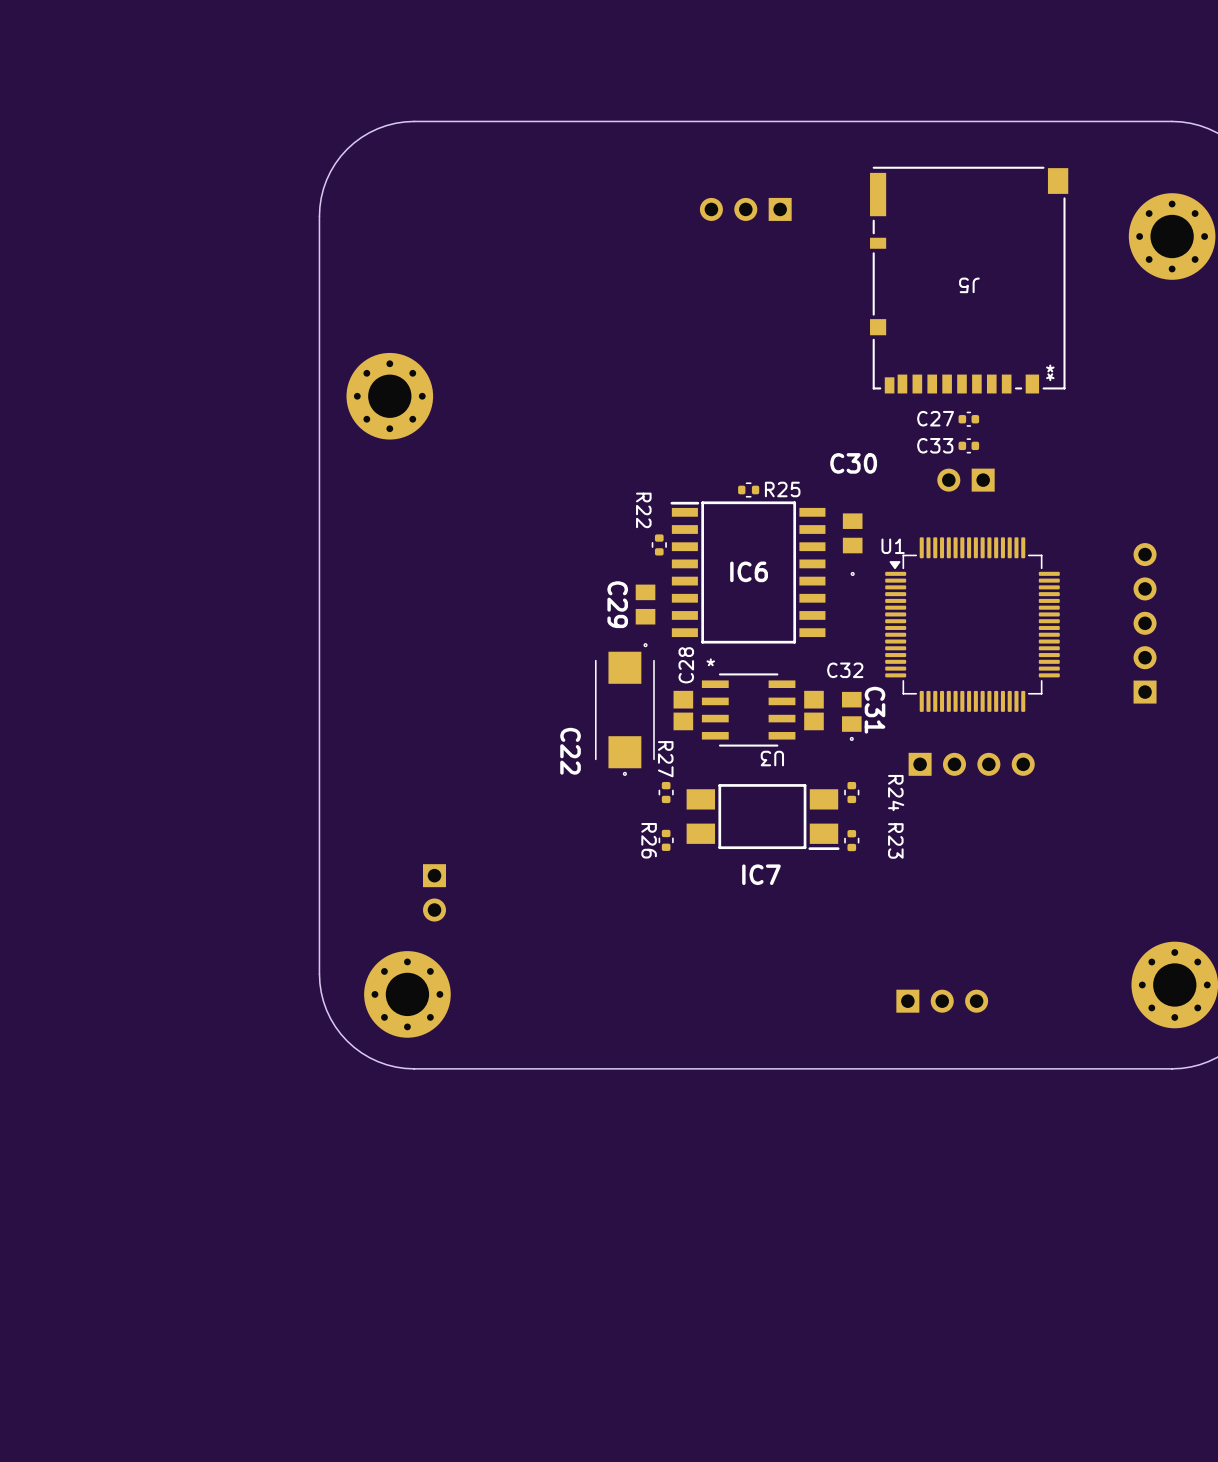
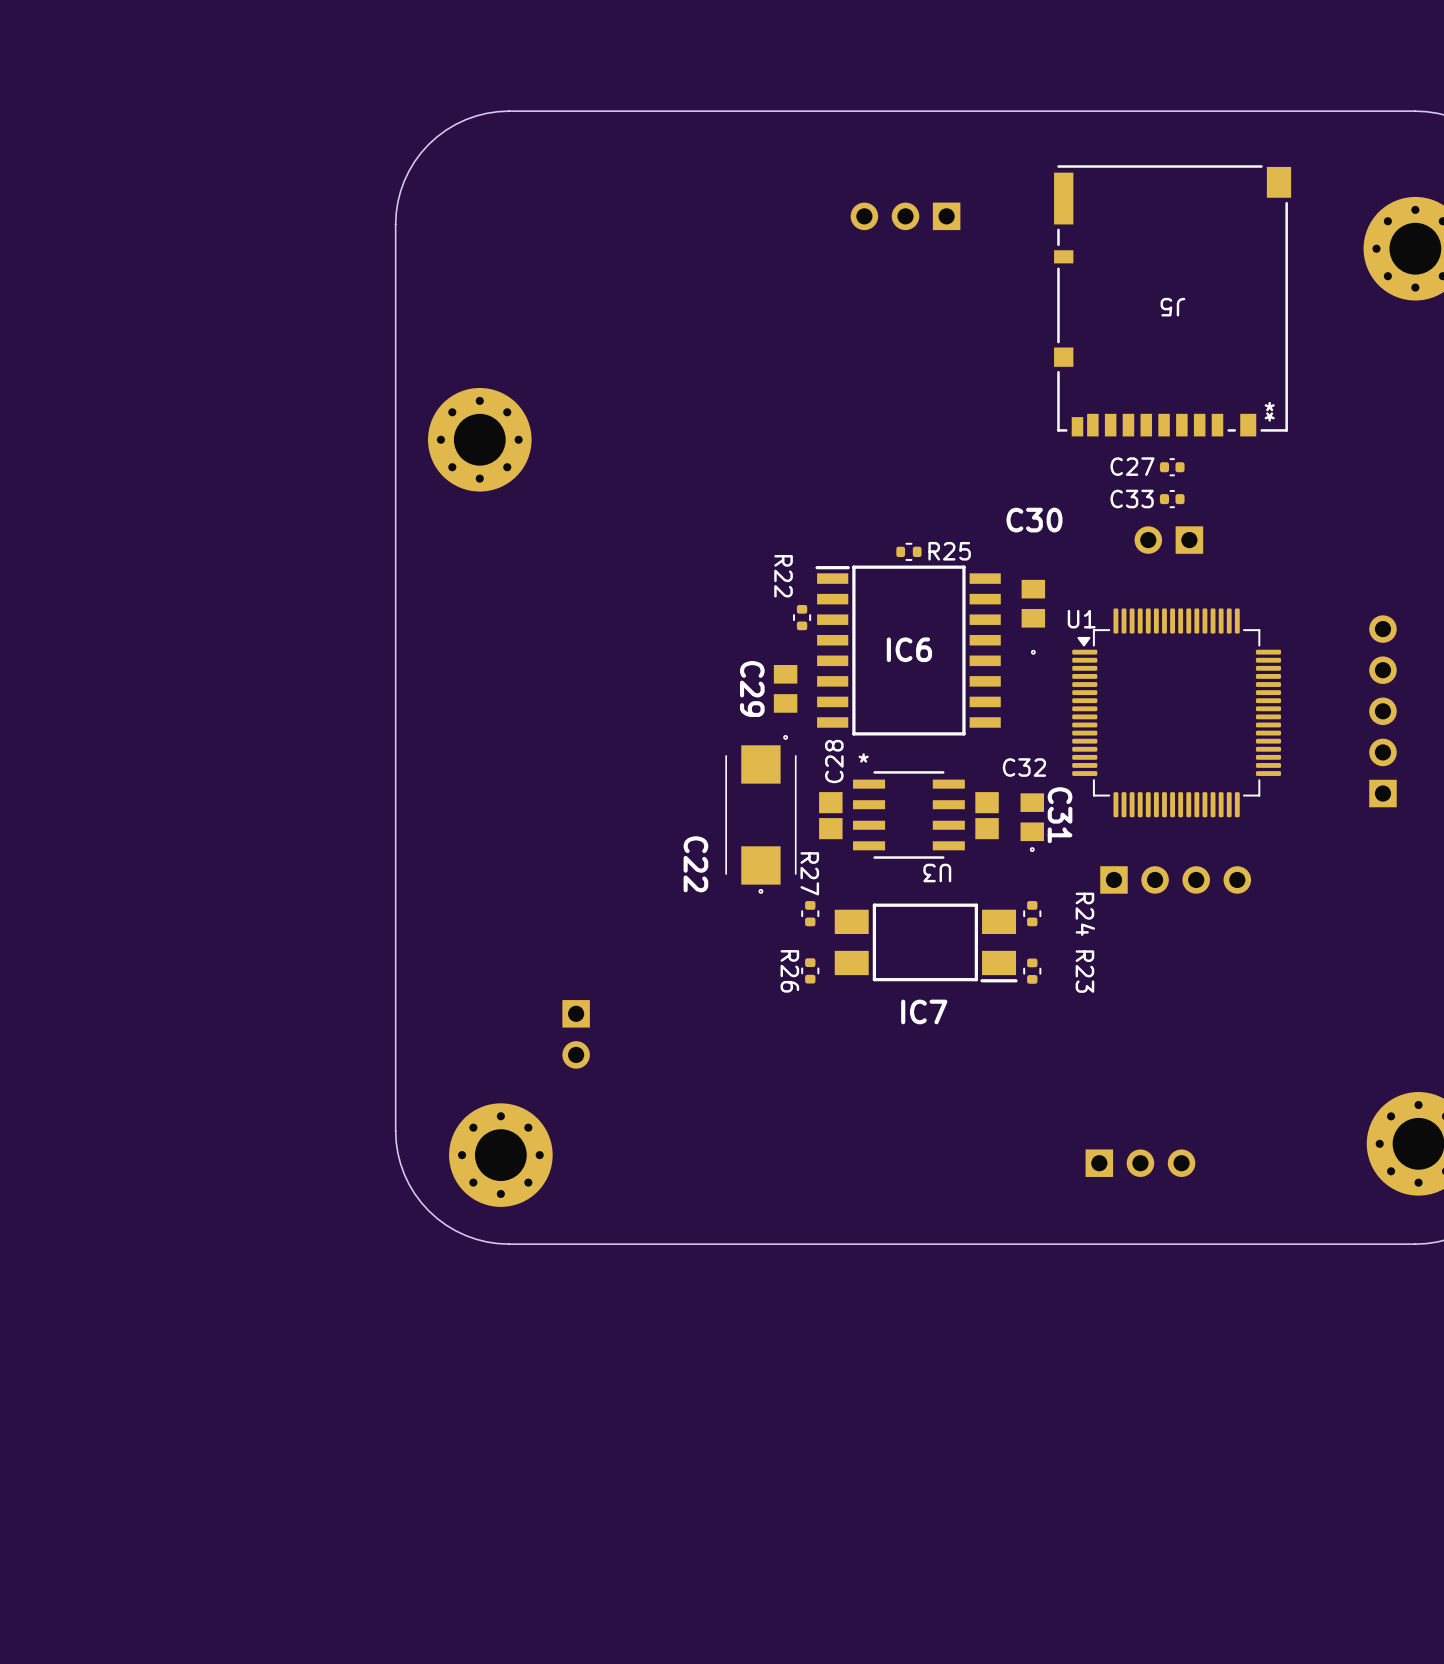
part position: (434, 892) -> (576, 1034)

